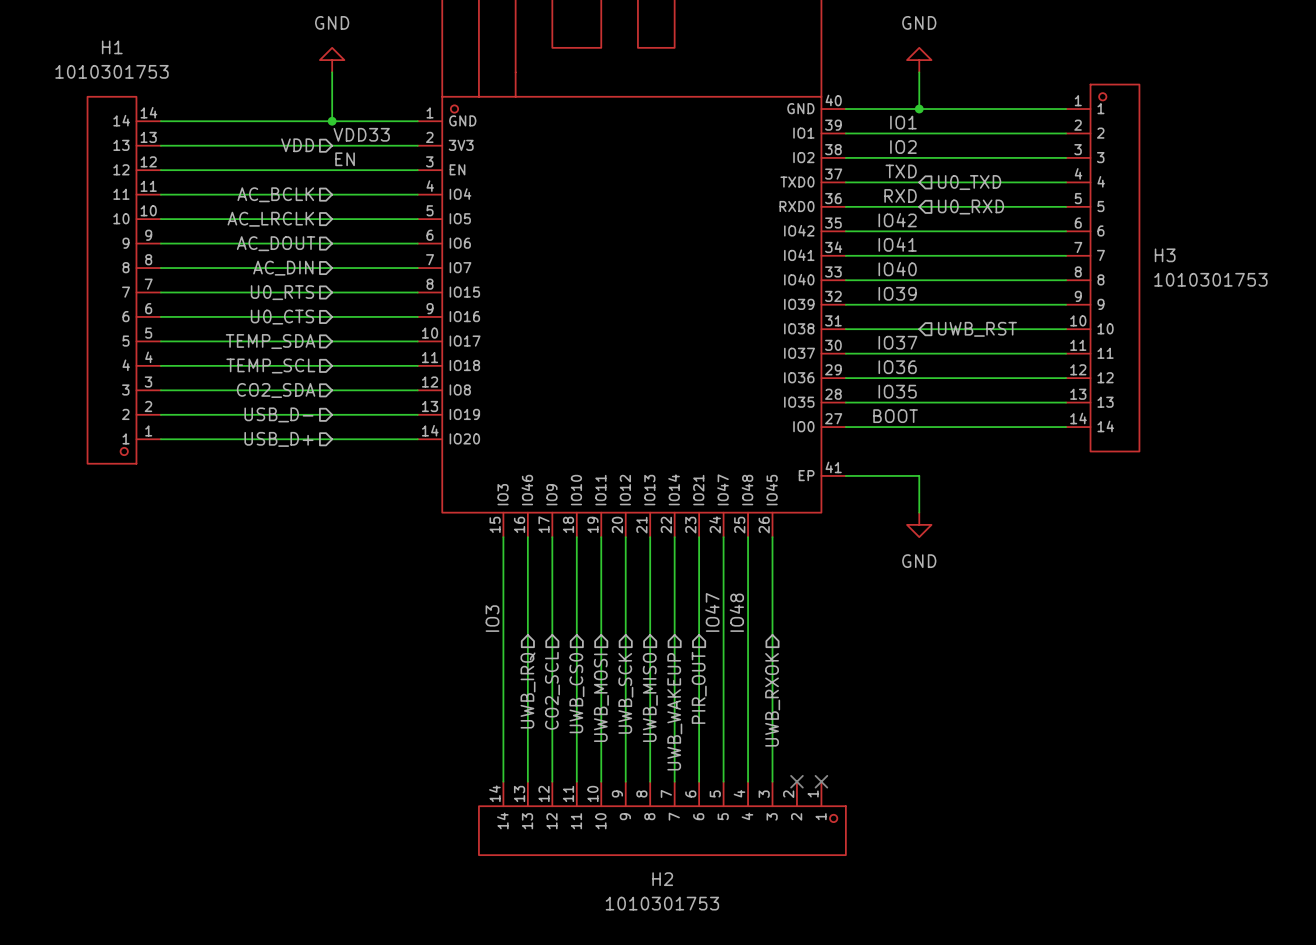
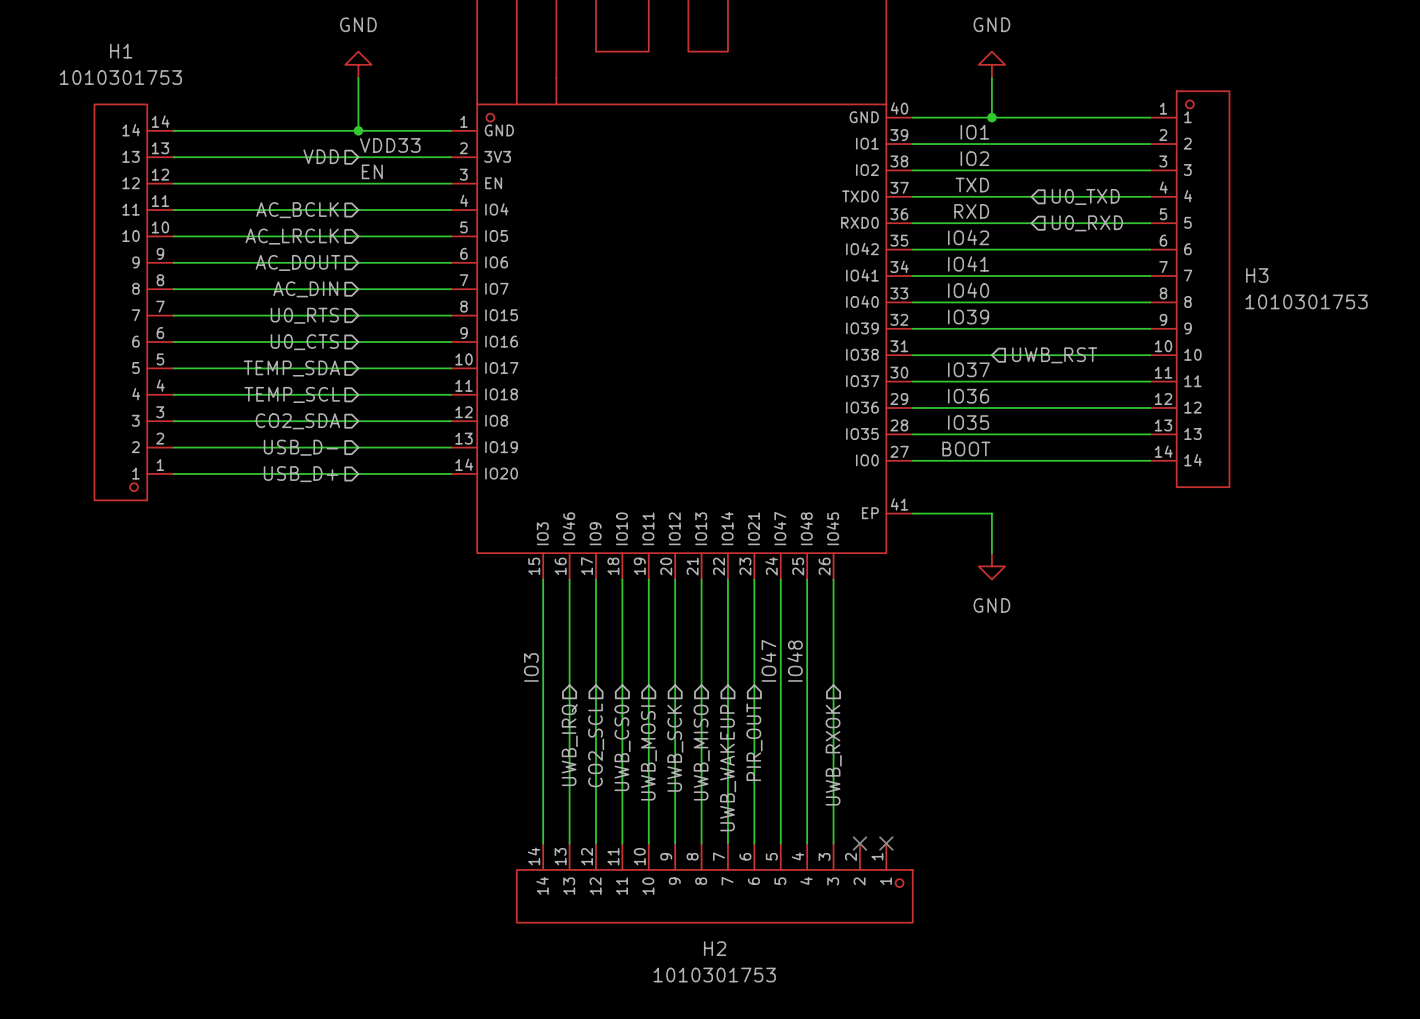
hierarchical label position: U0_TXD (969, 182) -> U0_TXD (1085, 196)
hierarchical label position: U0_RXD (971, 206) -> U0_RXD (1087, 223)

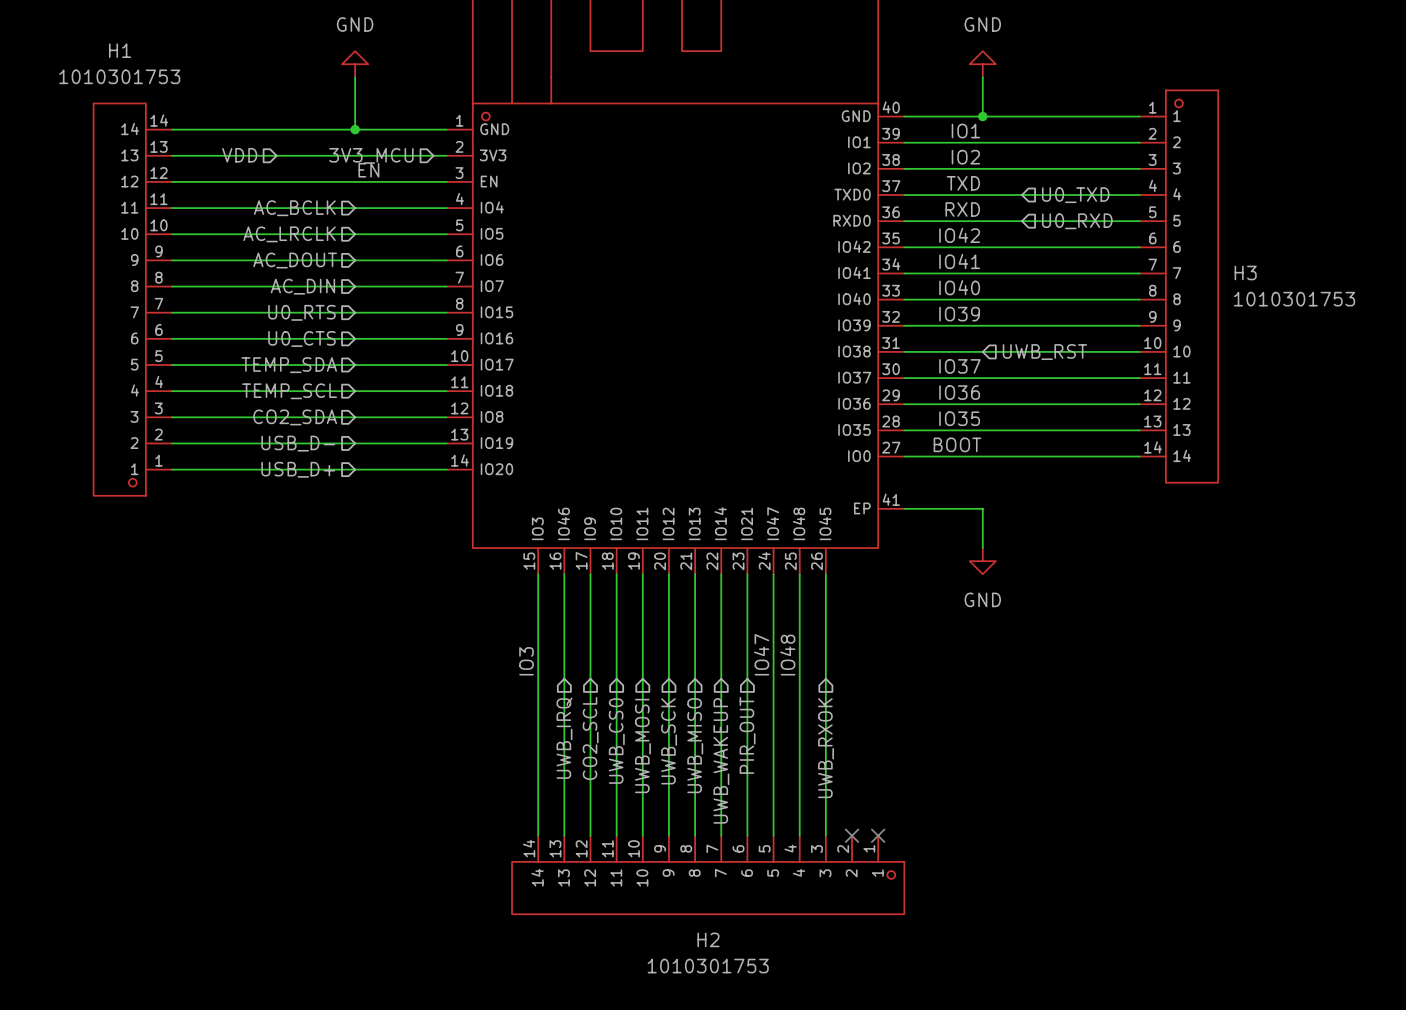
label: VDD33 (390, 145) -> none
hierarchical label position: VDD (321, 156) -> VDD (239, 155)
hierarchical label: none -> 3V3_MCU (371, 155)

